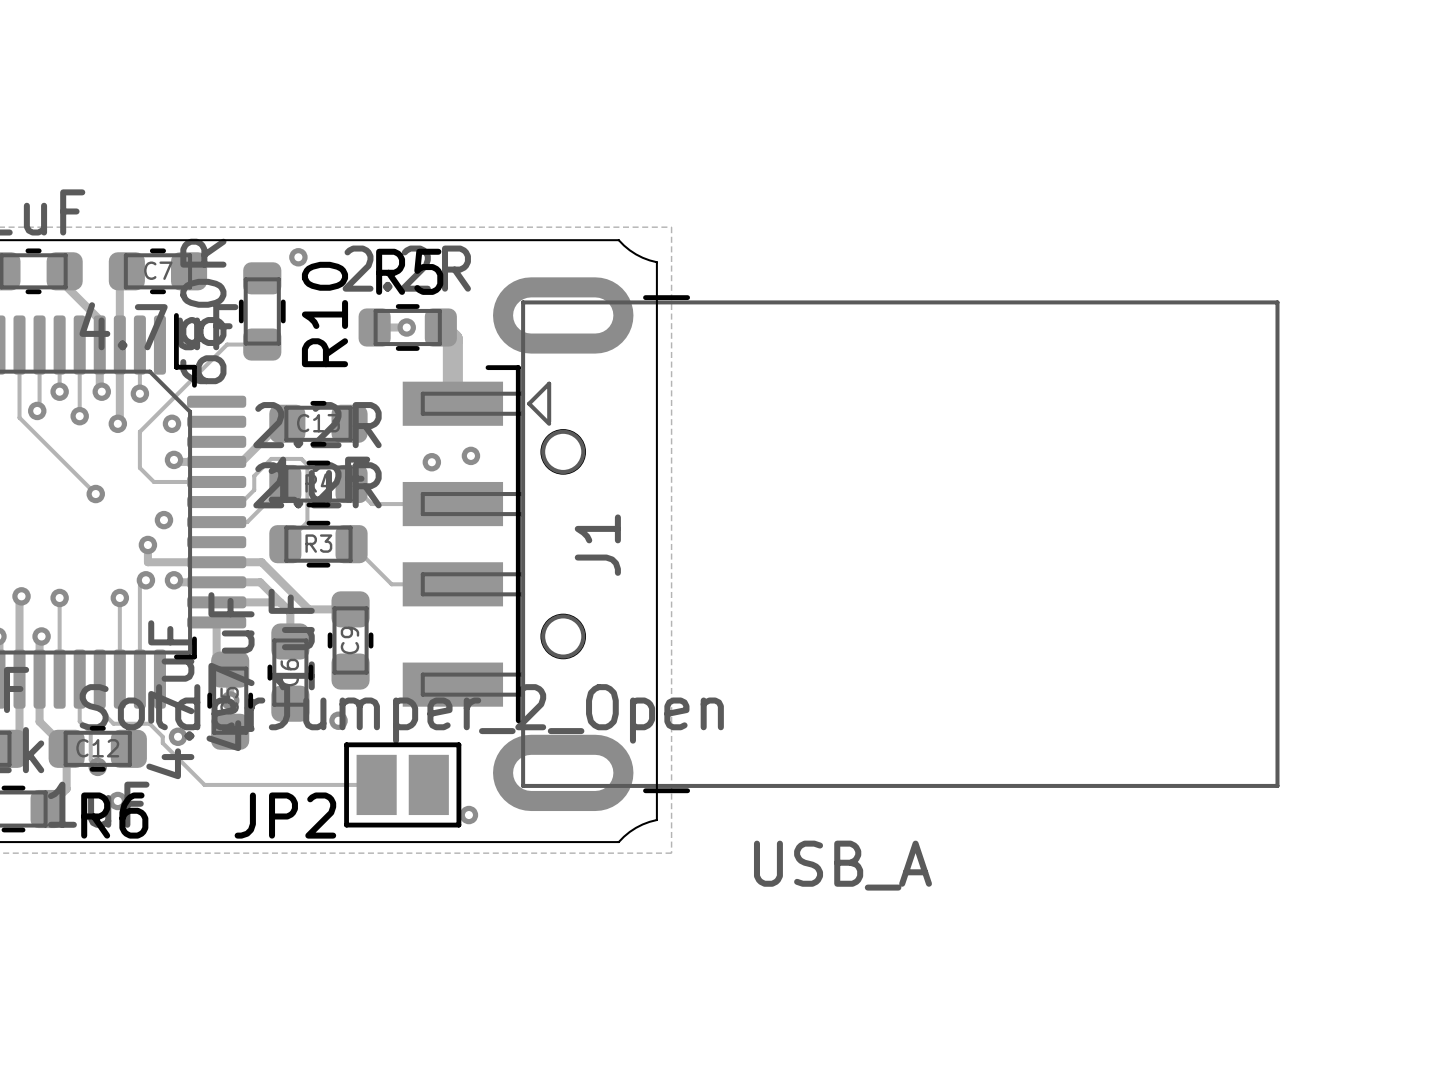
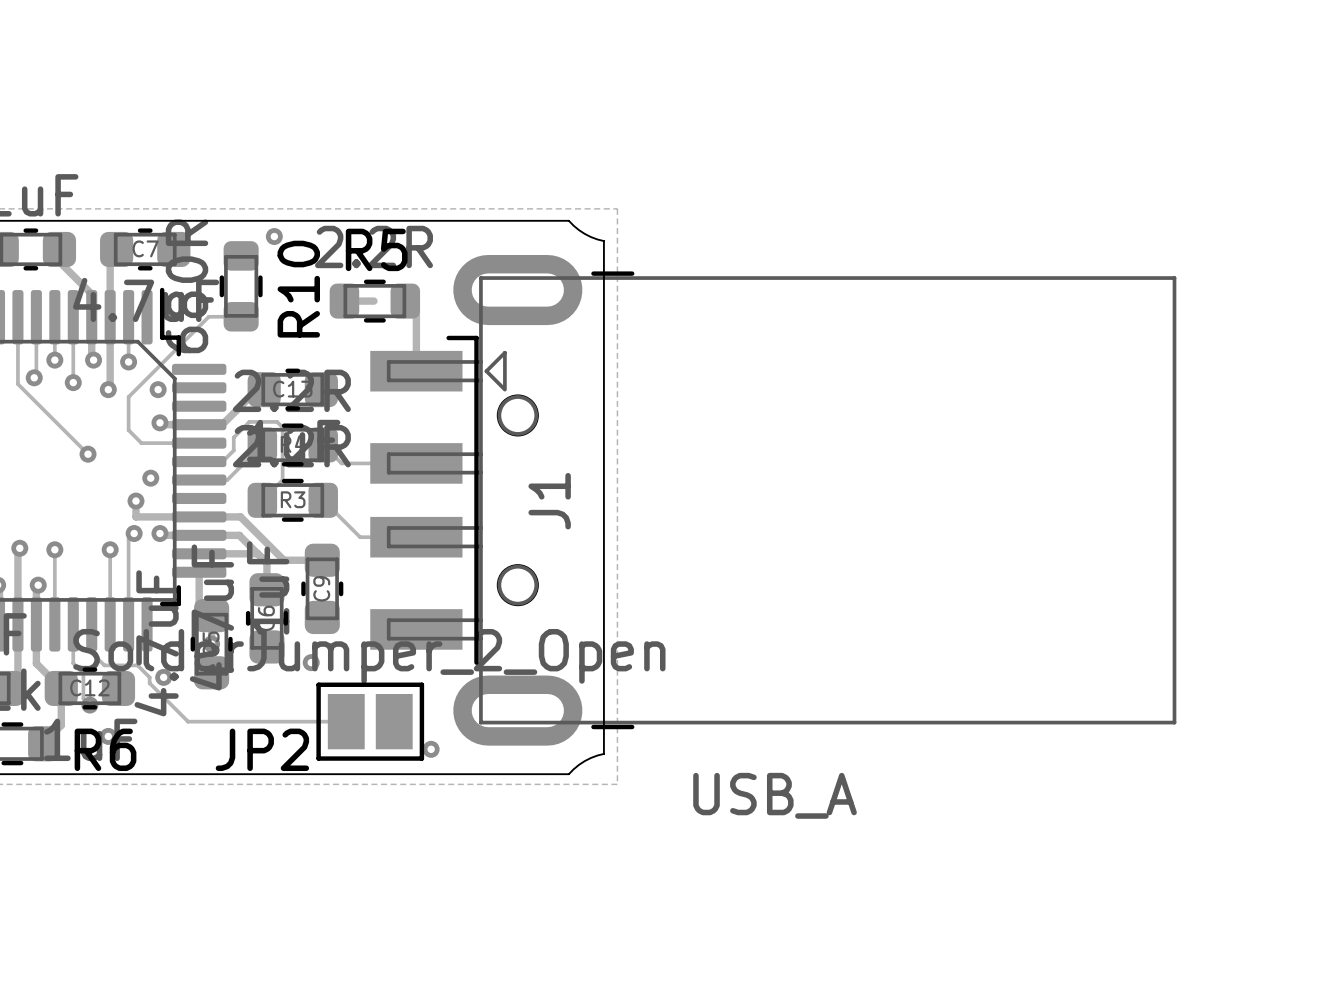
via: (406, 327) -> none
track width: thick (440, 327) (452, 339) (452, 403) -> thin (405, 301) (416, 312) (416, 371)
via: (470, 455) -> none
via: (431, 462) -> none

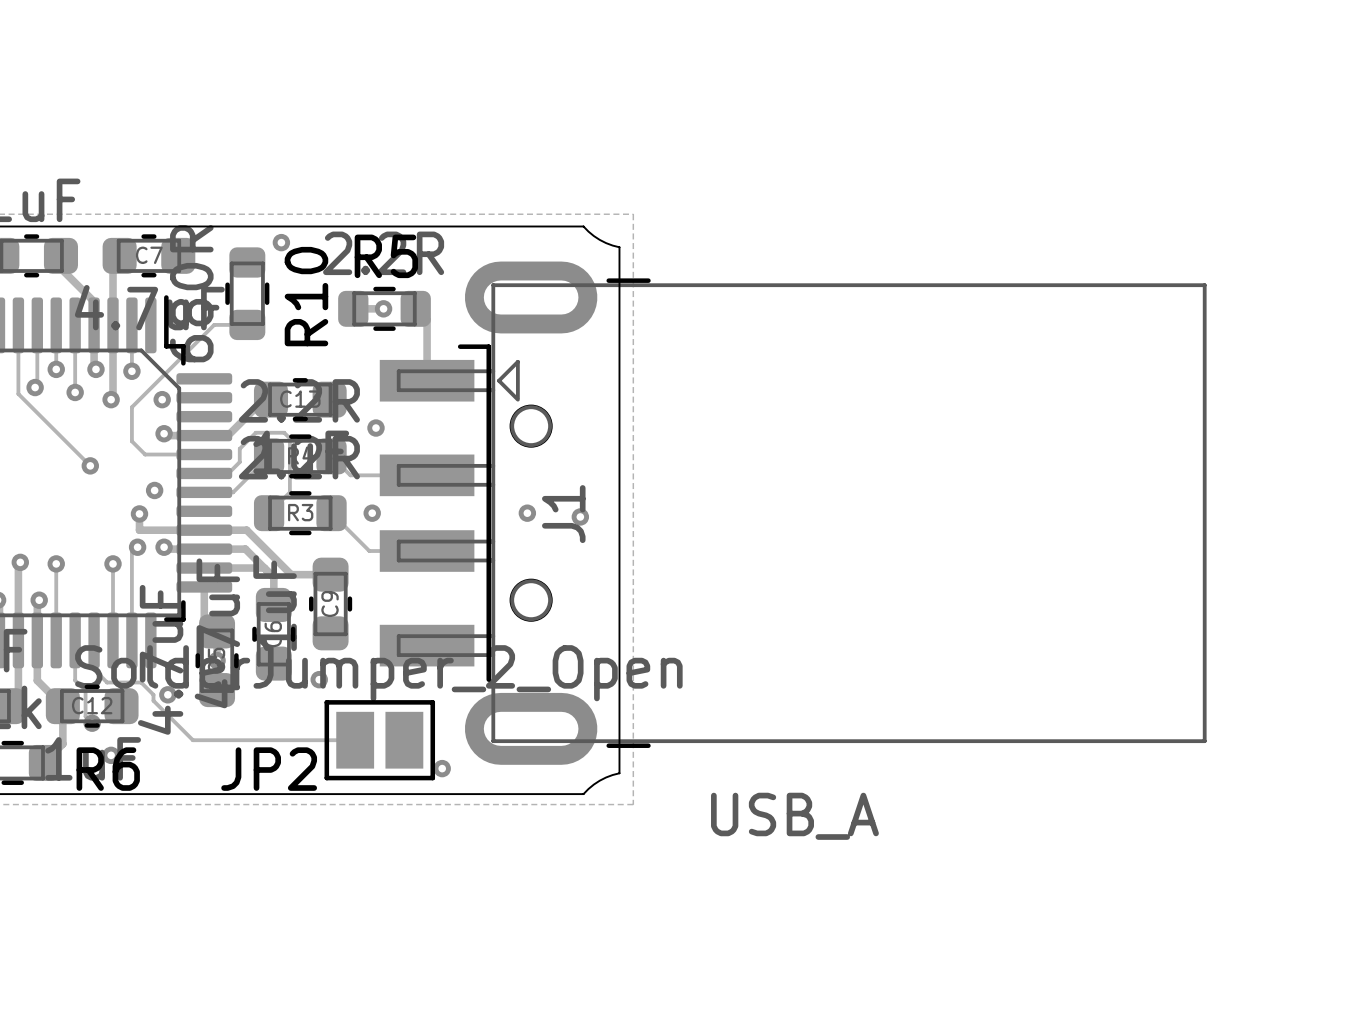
via: none -> (383, 308)
via: none -> (375, 428)
via: none -> (372, 513)
via: none -> (527, 513)
via: none -> (580, 516)

